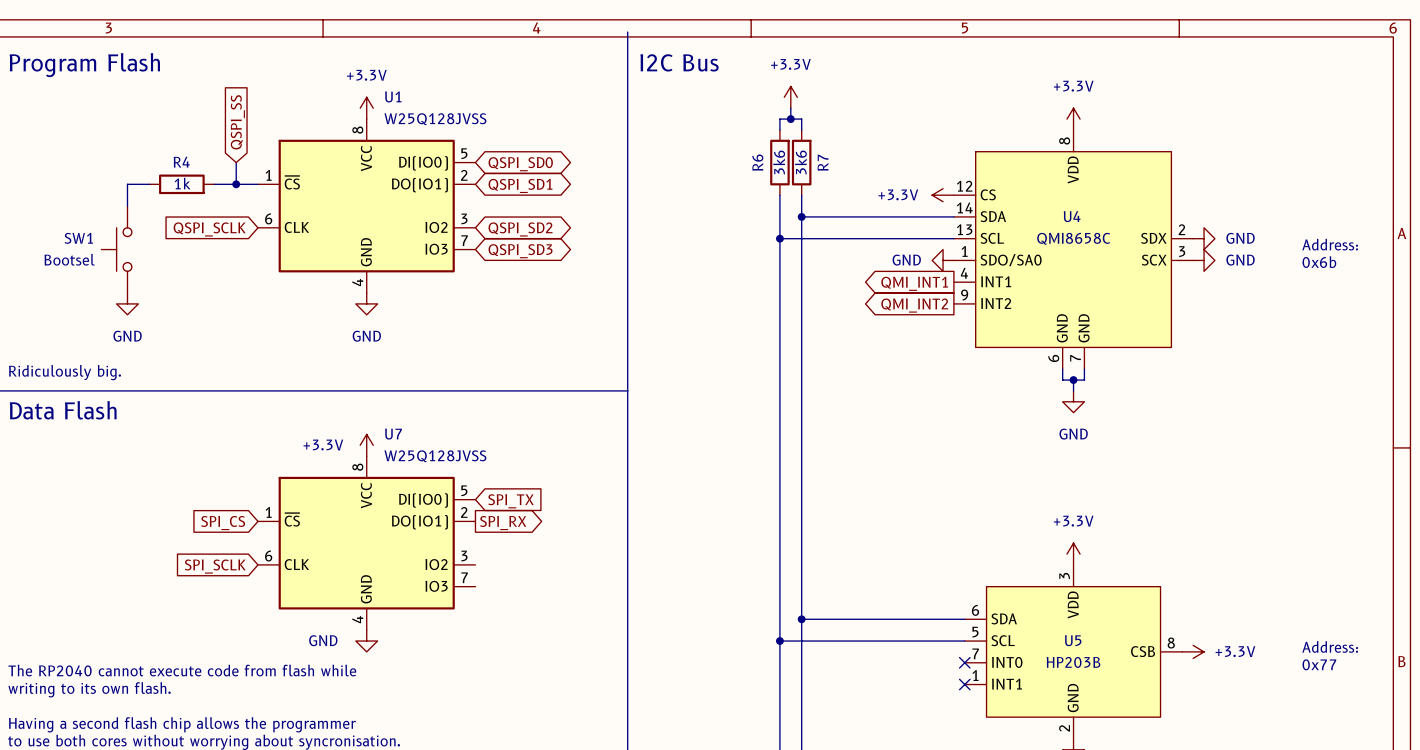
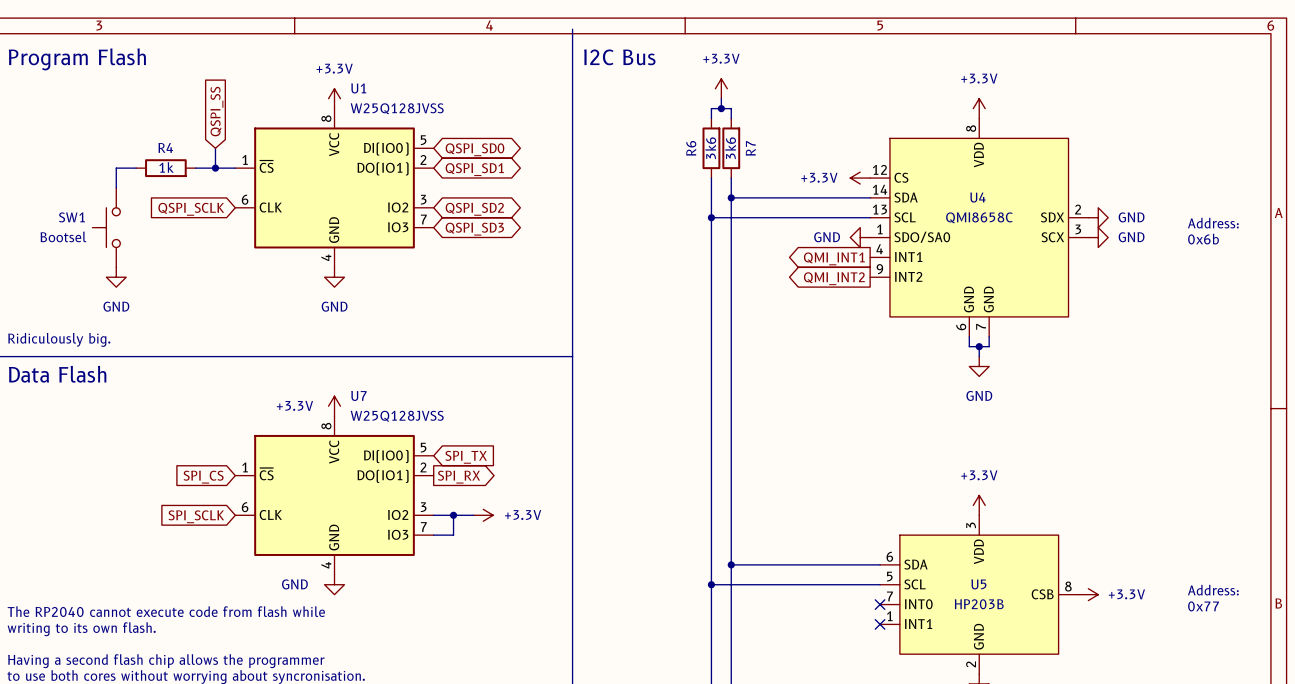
wire: none -> (433, 515) (473, 515)
wire: none -> (453, 515) (453, 535) (433, 535)
junction: none -> (453, 515)
power symbol: none -> +3.3V (483, 515)

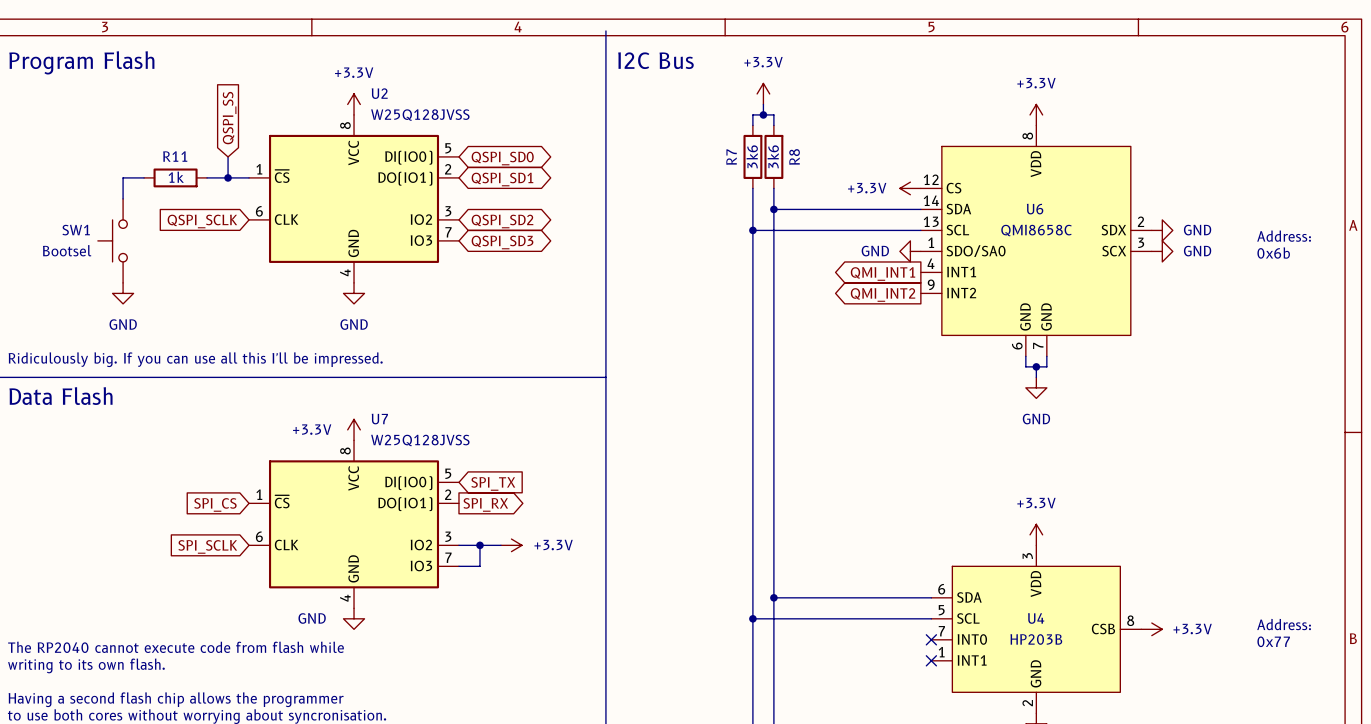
U1 name: U1 (358, 88) -> U2 (379, 93)
R4 name: R4 (165, 147) -> R11 (175, 156)
R6 name: R6 (691, 148) -> R7 (731, 157)
R7 name: R7 (750, 148) -> R8 (794, 156)
U4 name: U4 (977, 197) -> U6 (1035, 209)
text: Ridiculously big. (59, 339) -> Ridiculously big. If you can use all this I'll be impressed. (195, 359)
U5 name: U5 (978, 584) -> U4 (1036, 618)

